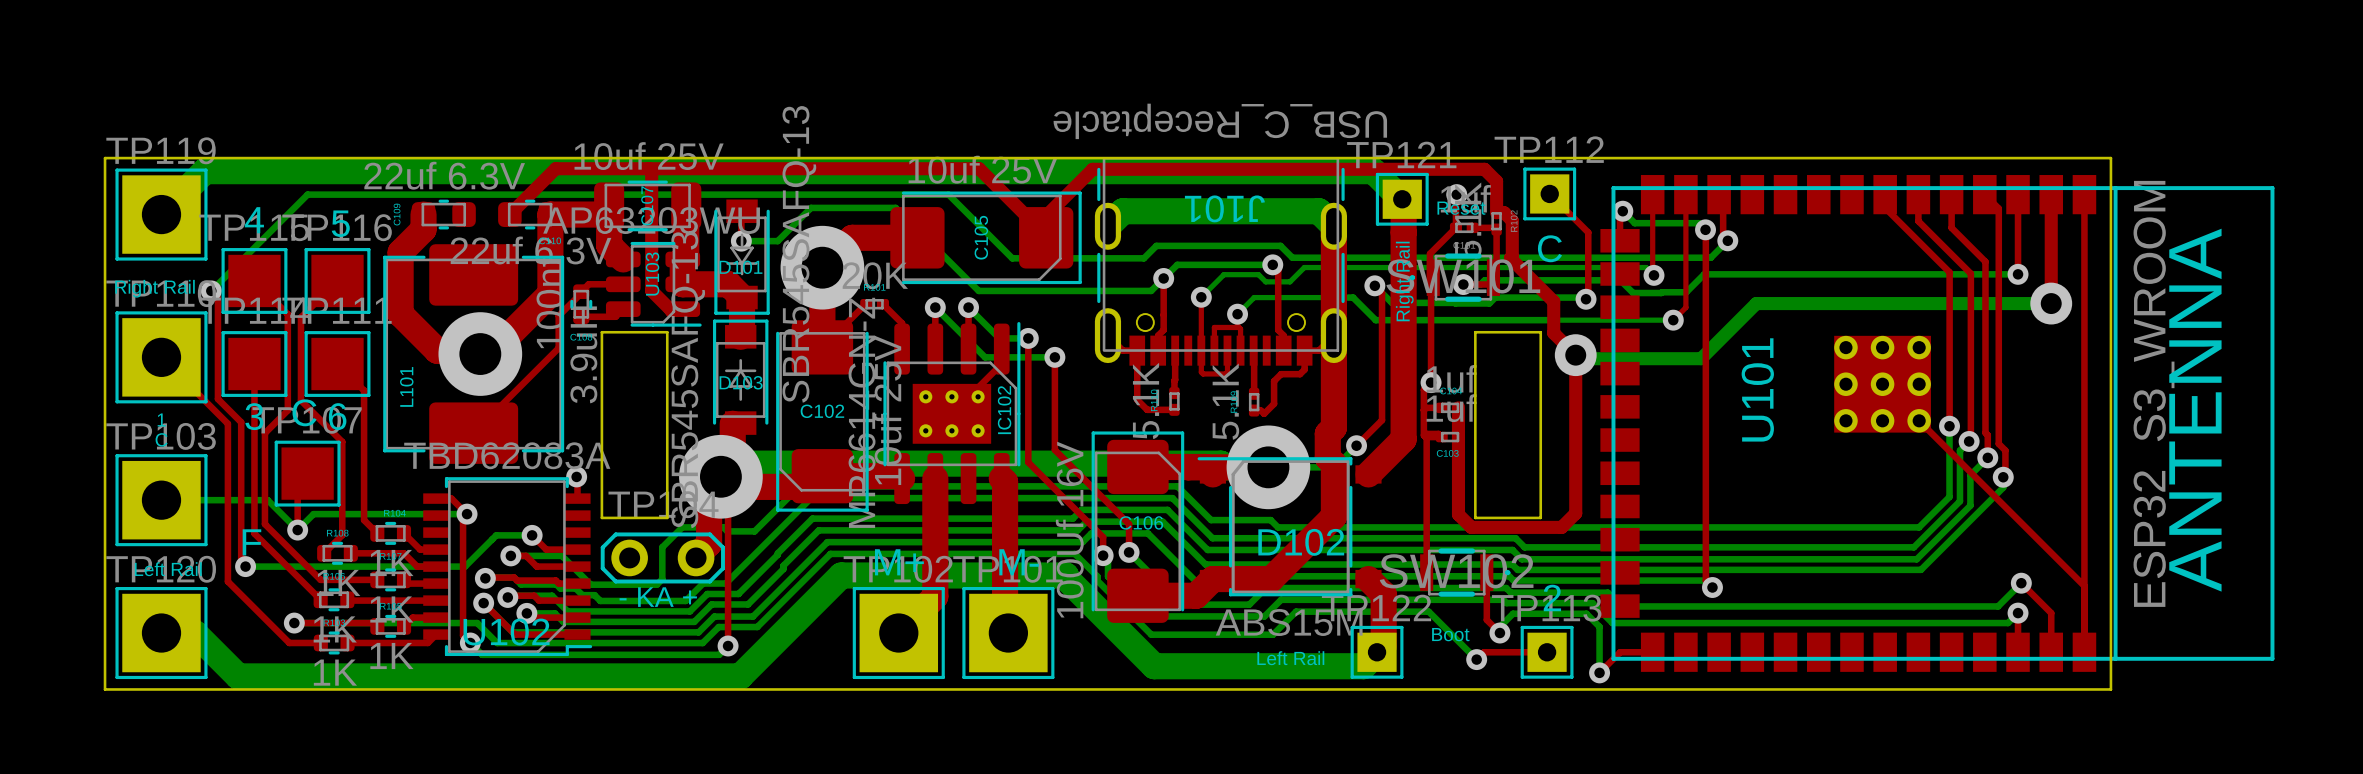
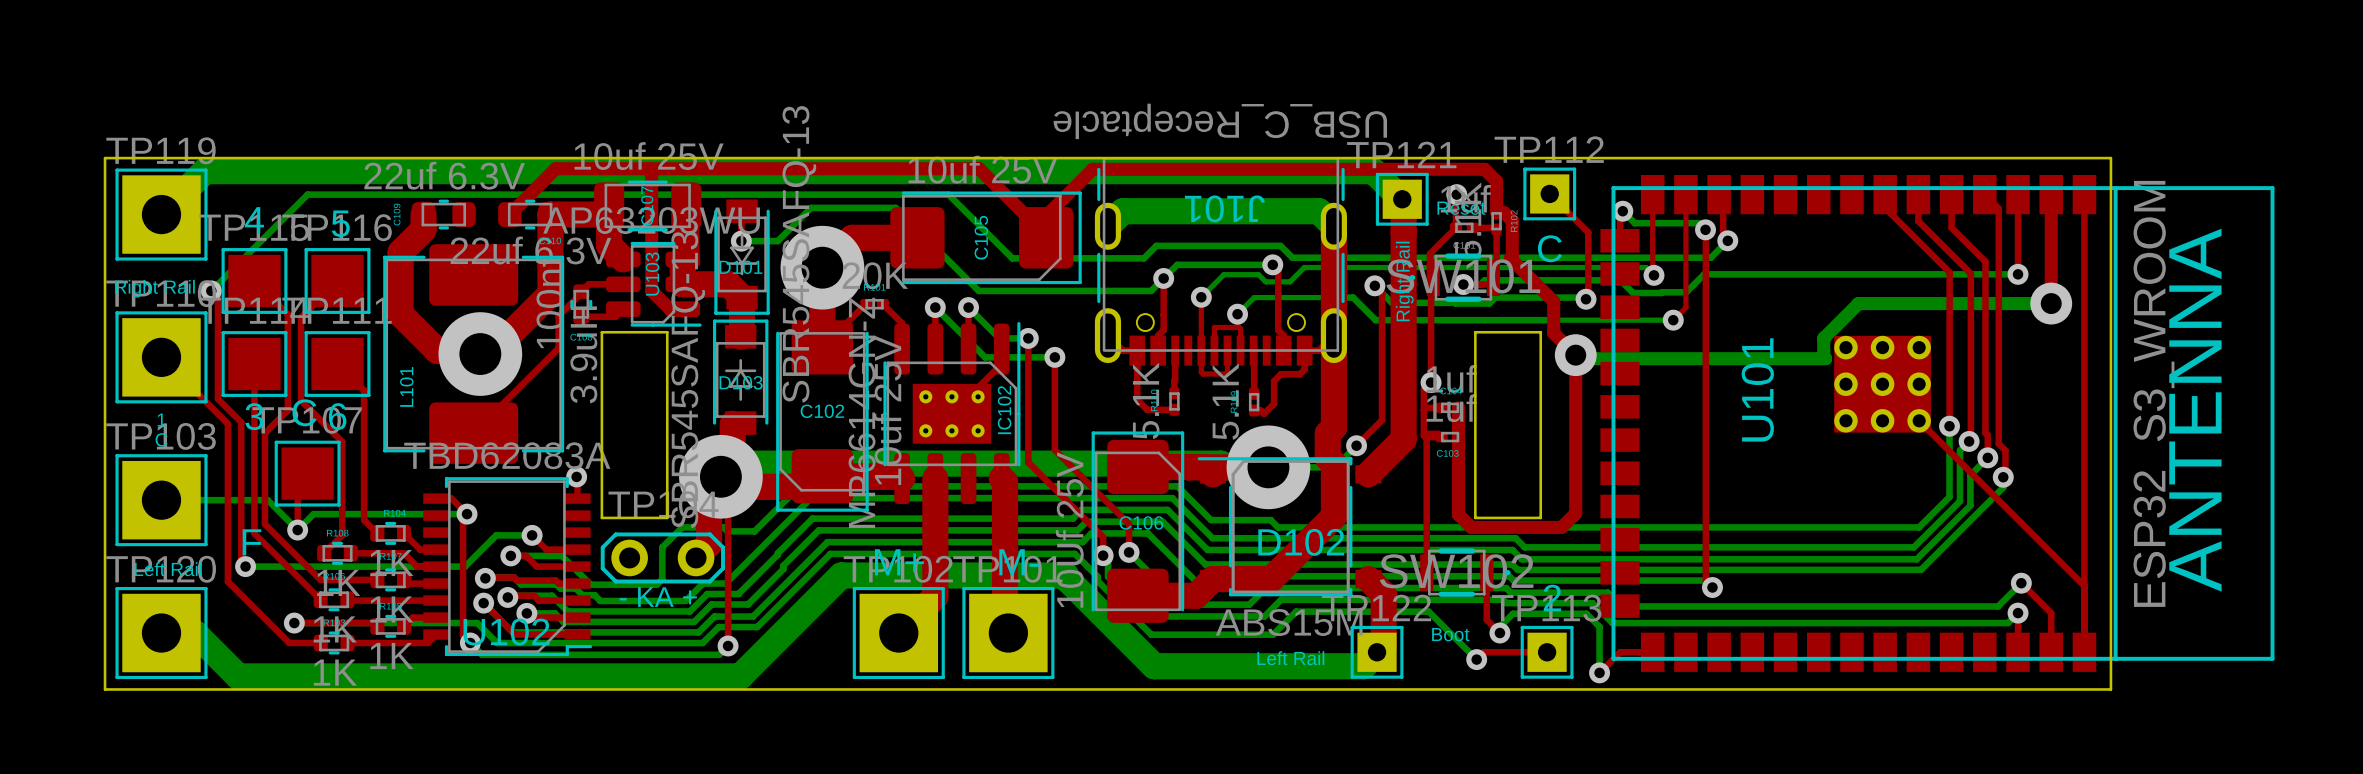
bottom track: (1858, 303) (1756, 303) (1701, 358) -> (1858, 303) (1823, 338) (1823, 356) (1825, 358) (1701, 358)
C106 value: 100Uf 16V (1069, 529) -> 10Uf 25V (1069, 529)

